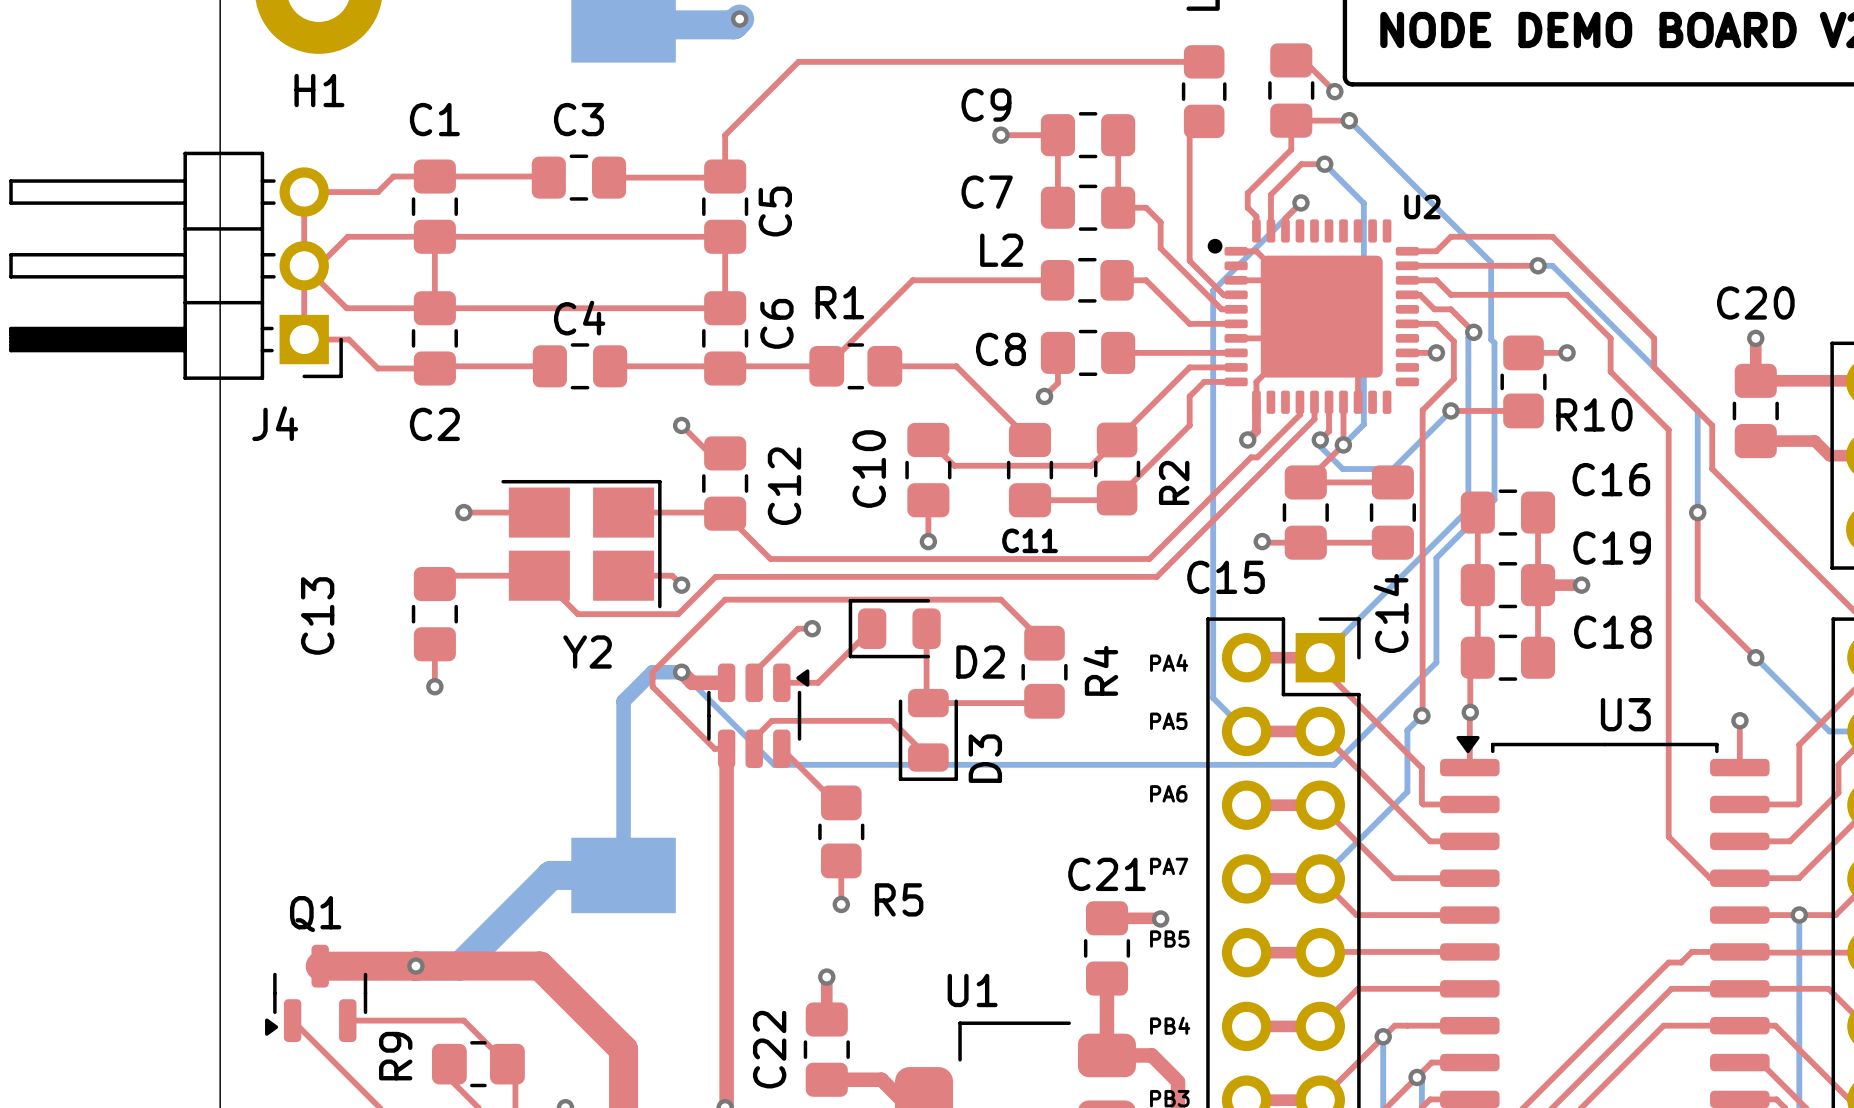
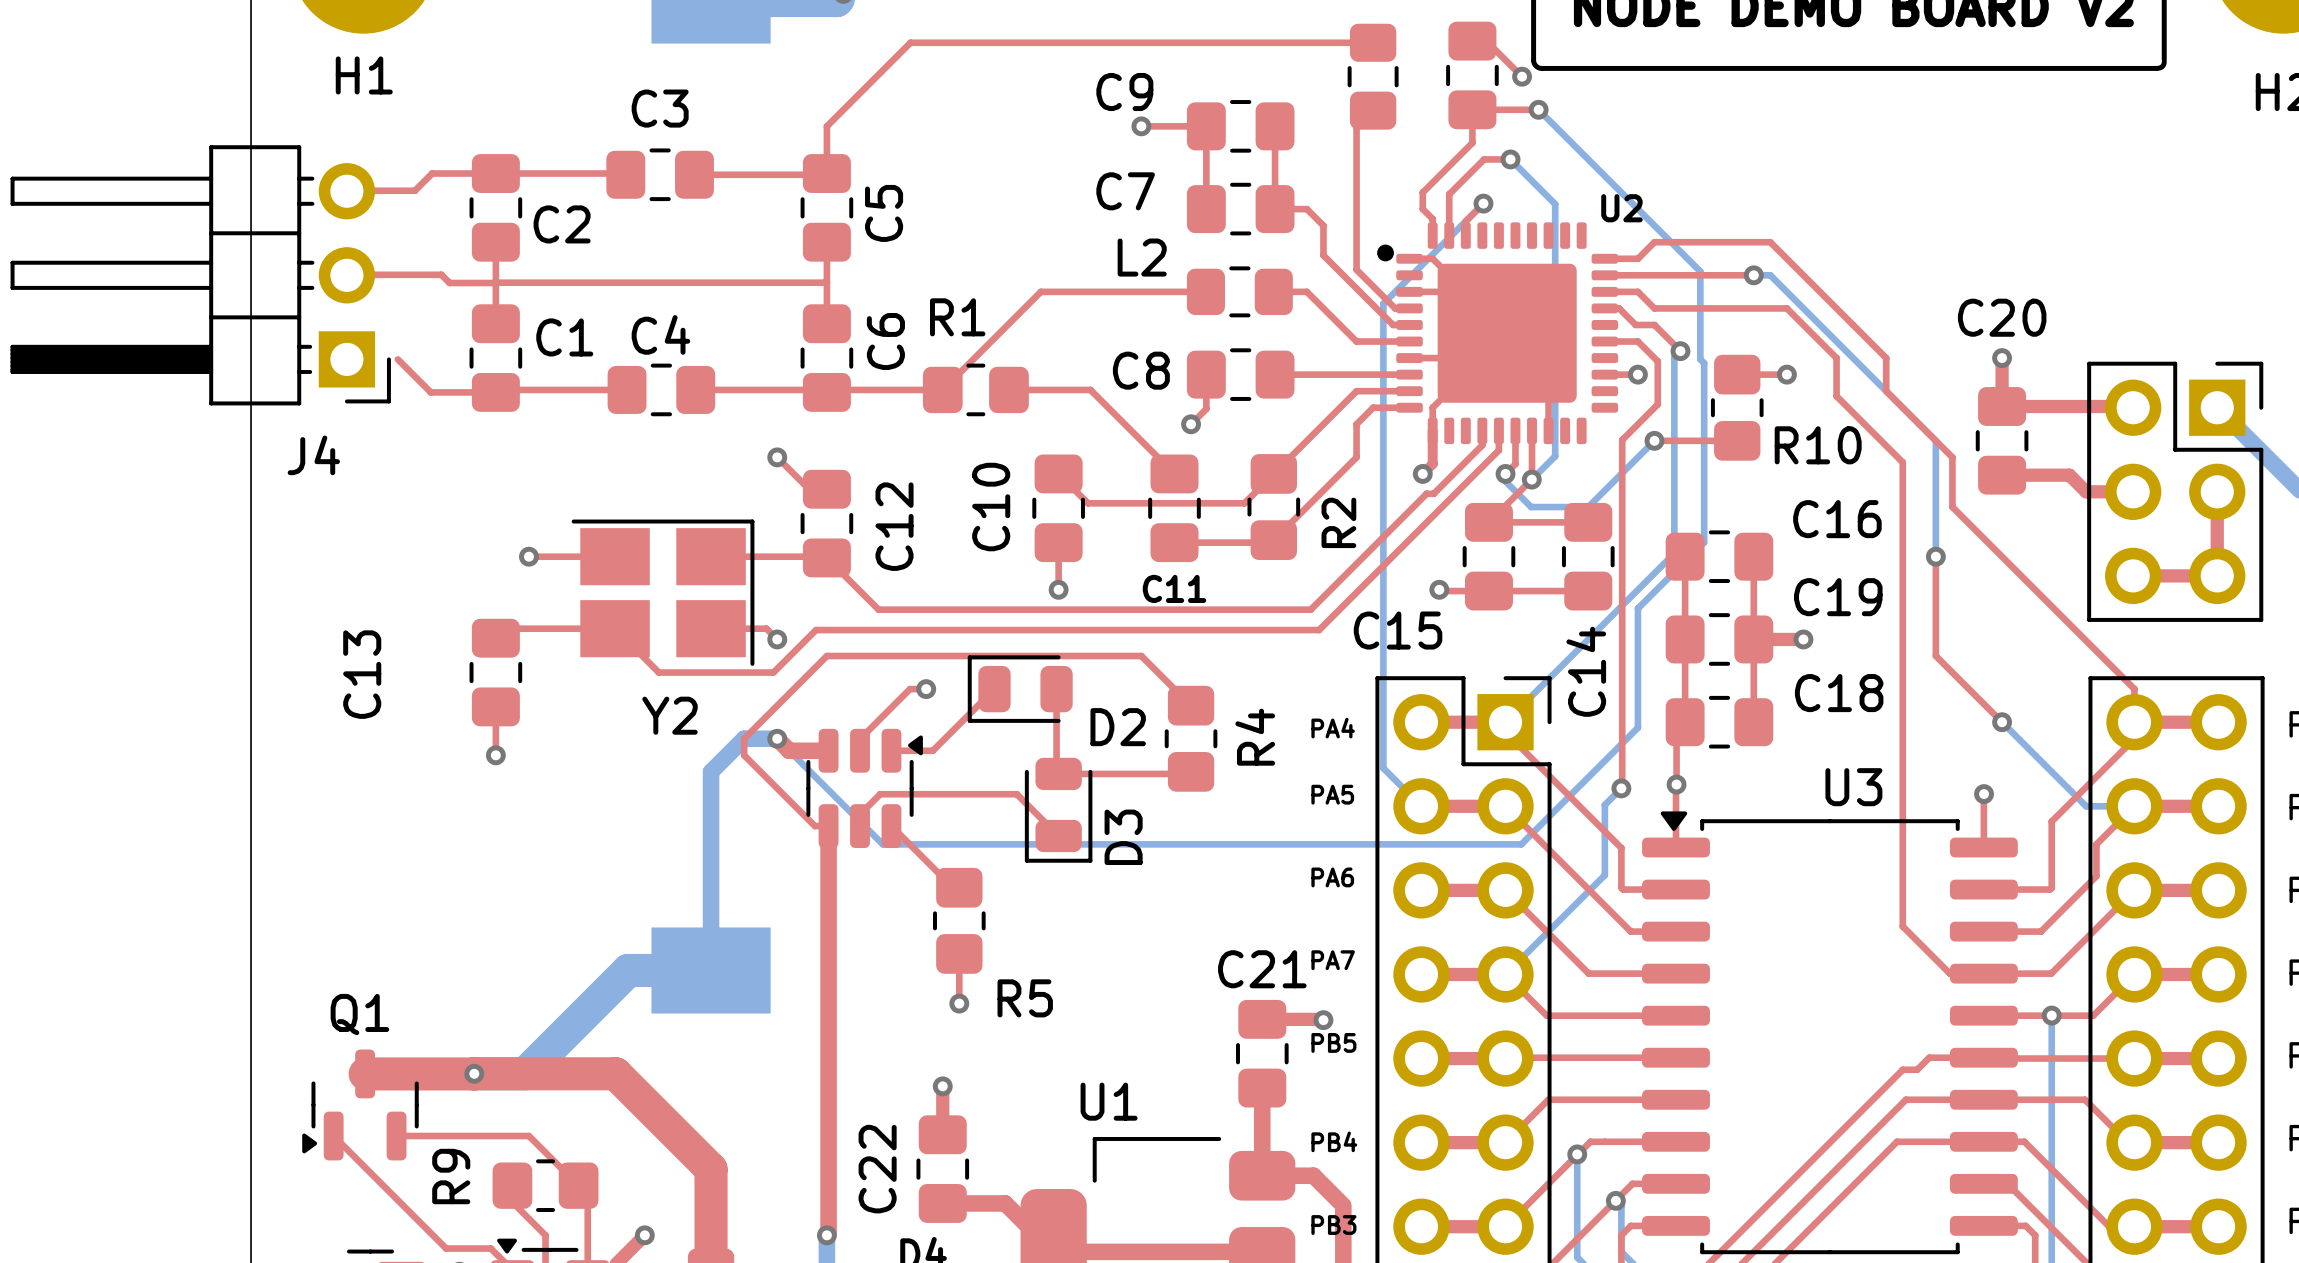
C1 name position: C1 (434, 119) -> C1 (564, 337)
top track: (393, 176) (377, 192) (304, 192) (304, 339) (348, 339) -> (448, 173) (432, 173) (414, 190) (342, 190)
top track: (725, 236) (347, 236) (318, 265) -> none
top track: none -> (342, 274) (441, 274) (449, 283) (495, 283)
top track: (304, 265) (346, 308) (433, 308) -> none
top track: (434, 308) (725, 308) -> (495, 282) (826, 282)
C2 name position: C2 (434, 424) -> C2 (562, 224)

